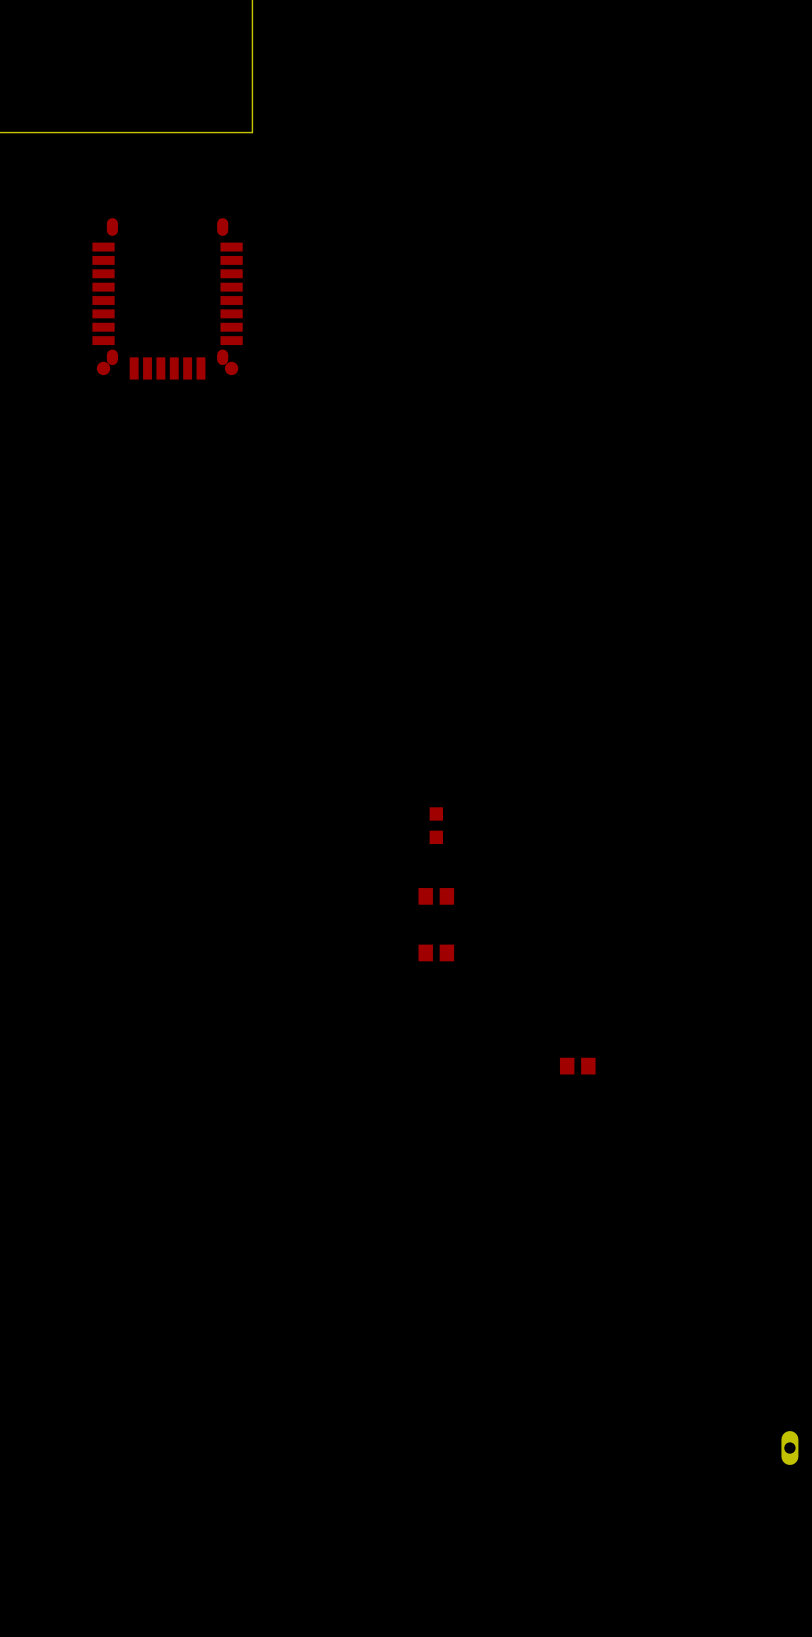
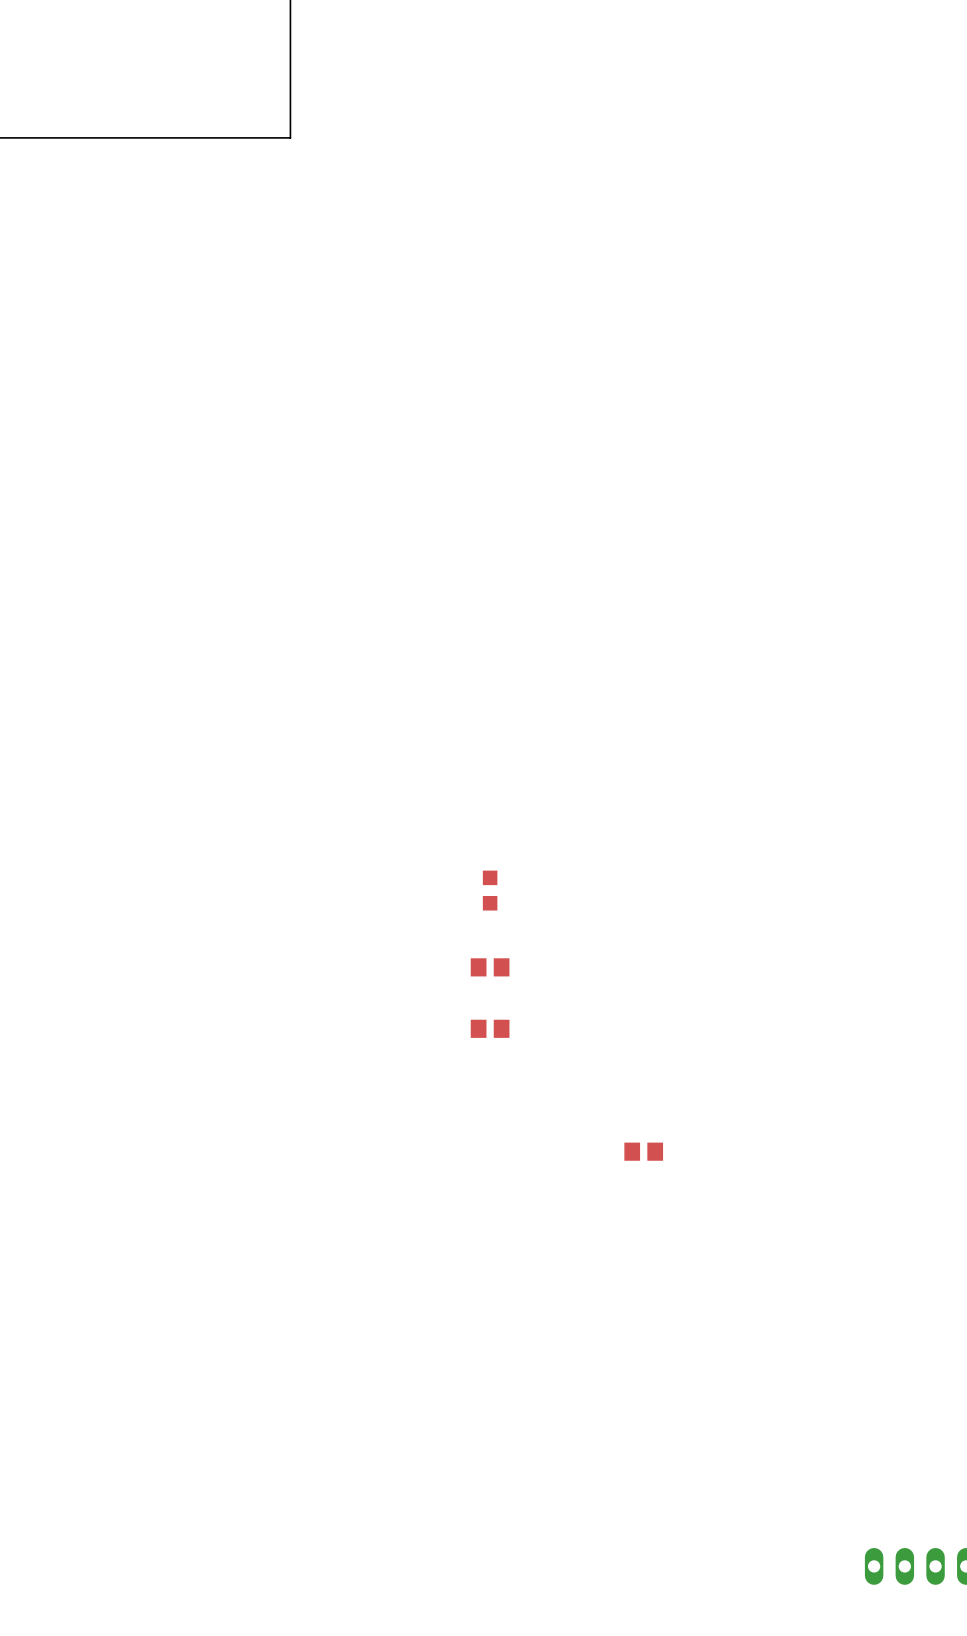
part: (167, 298) -> none

